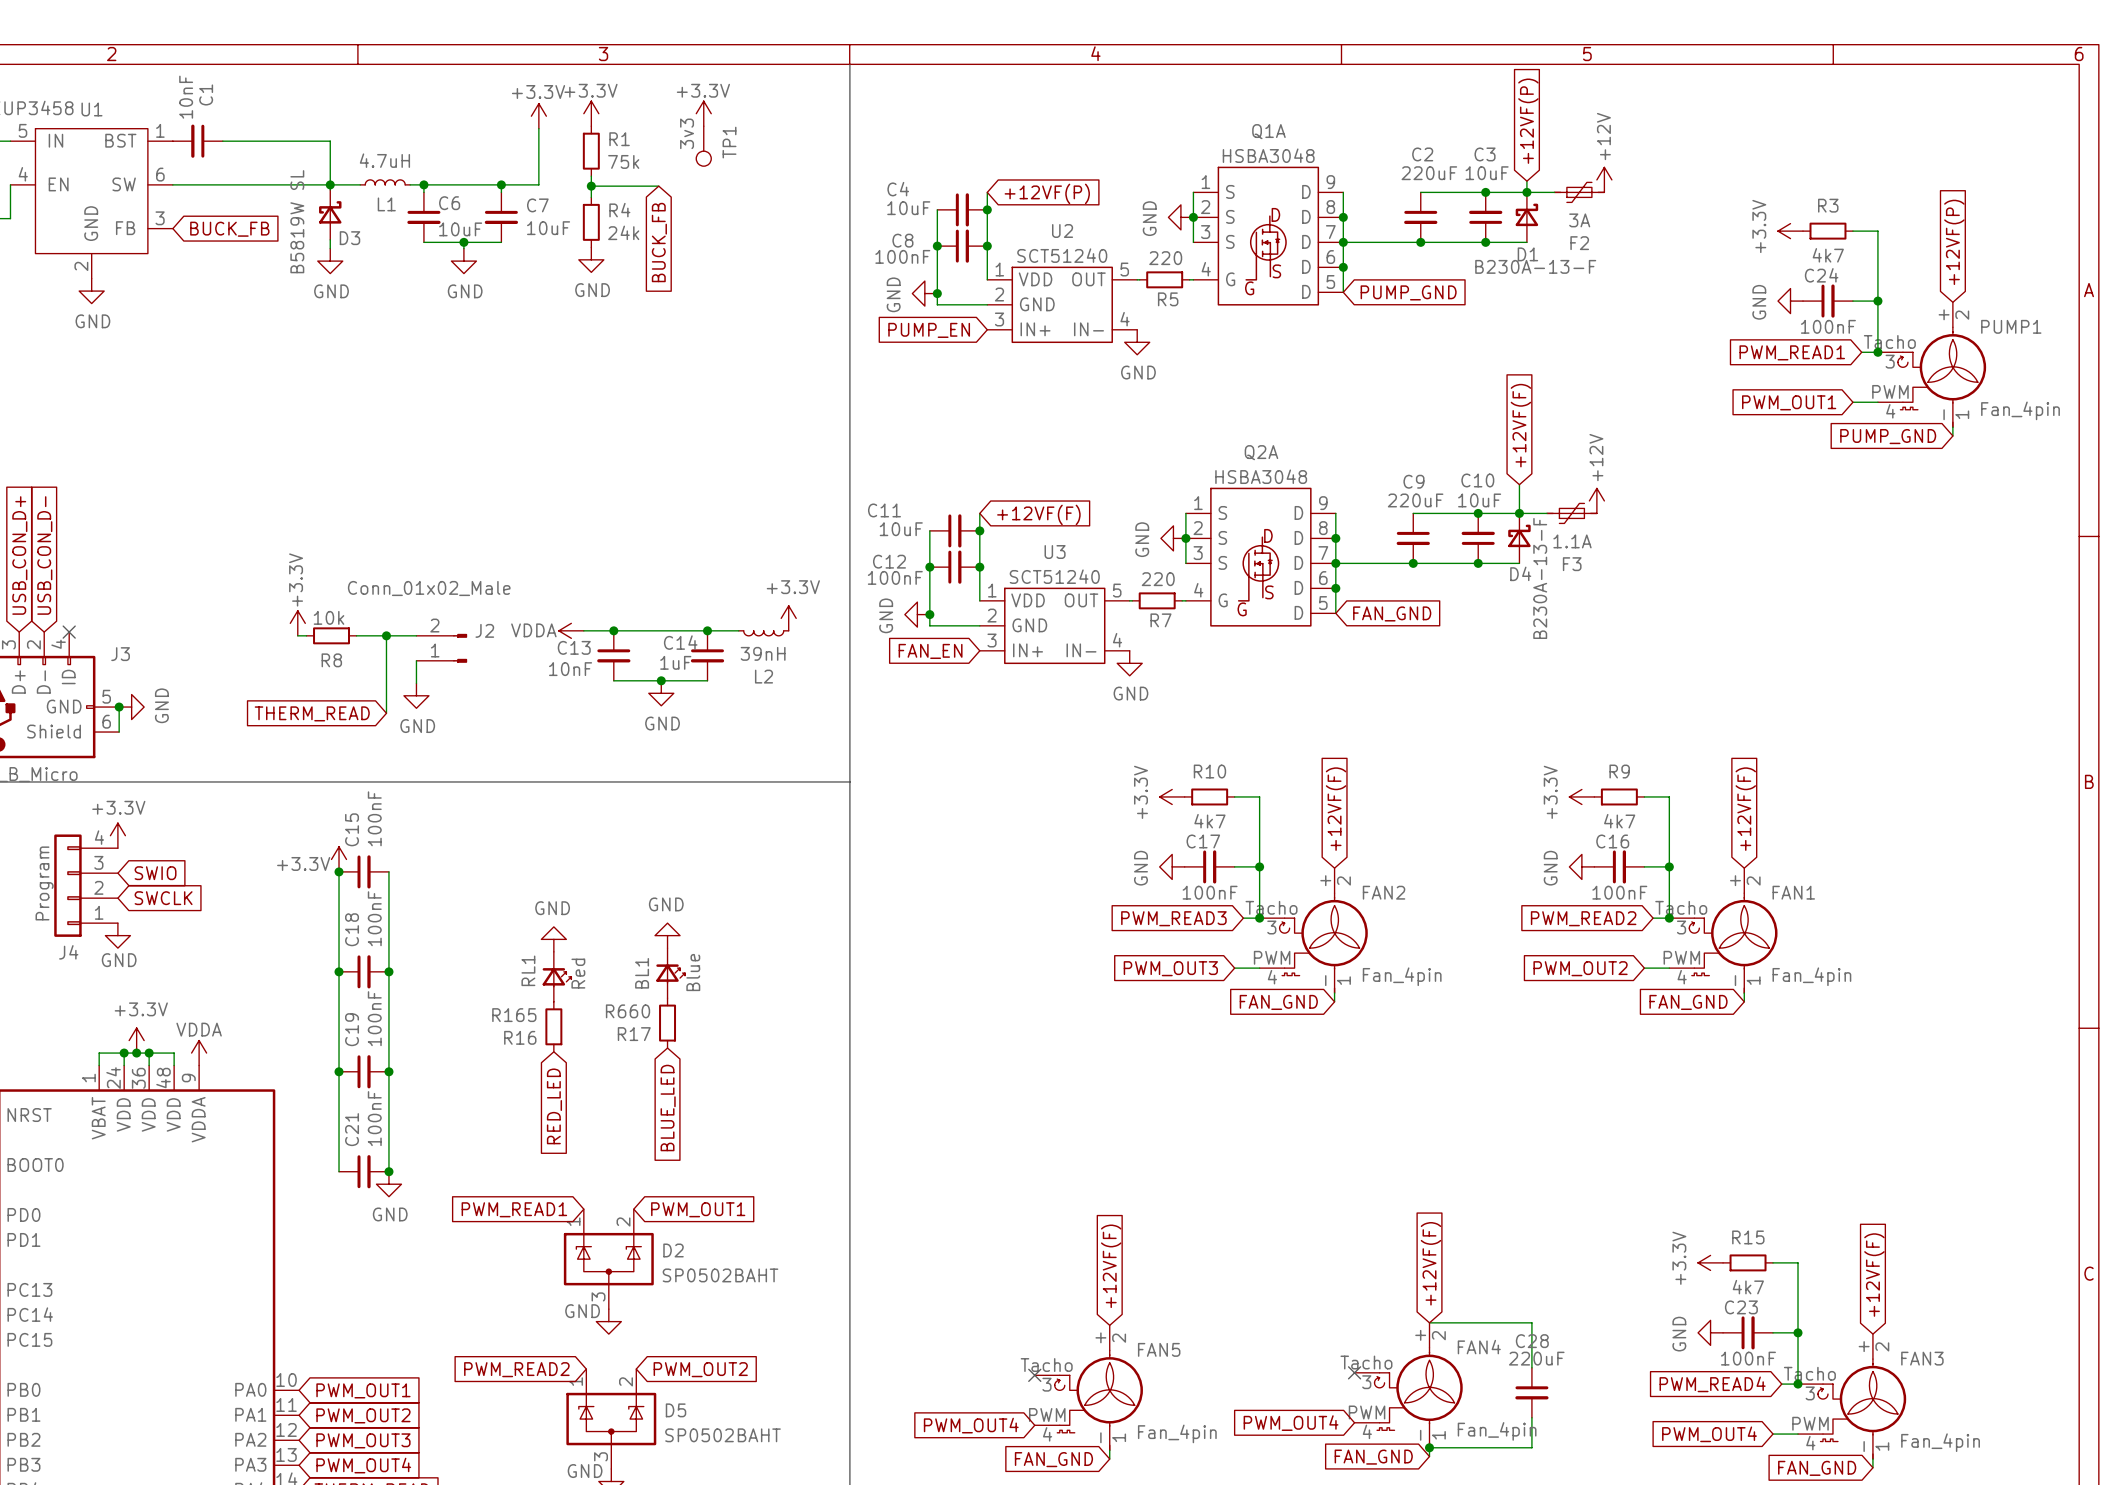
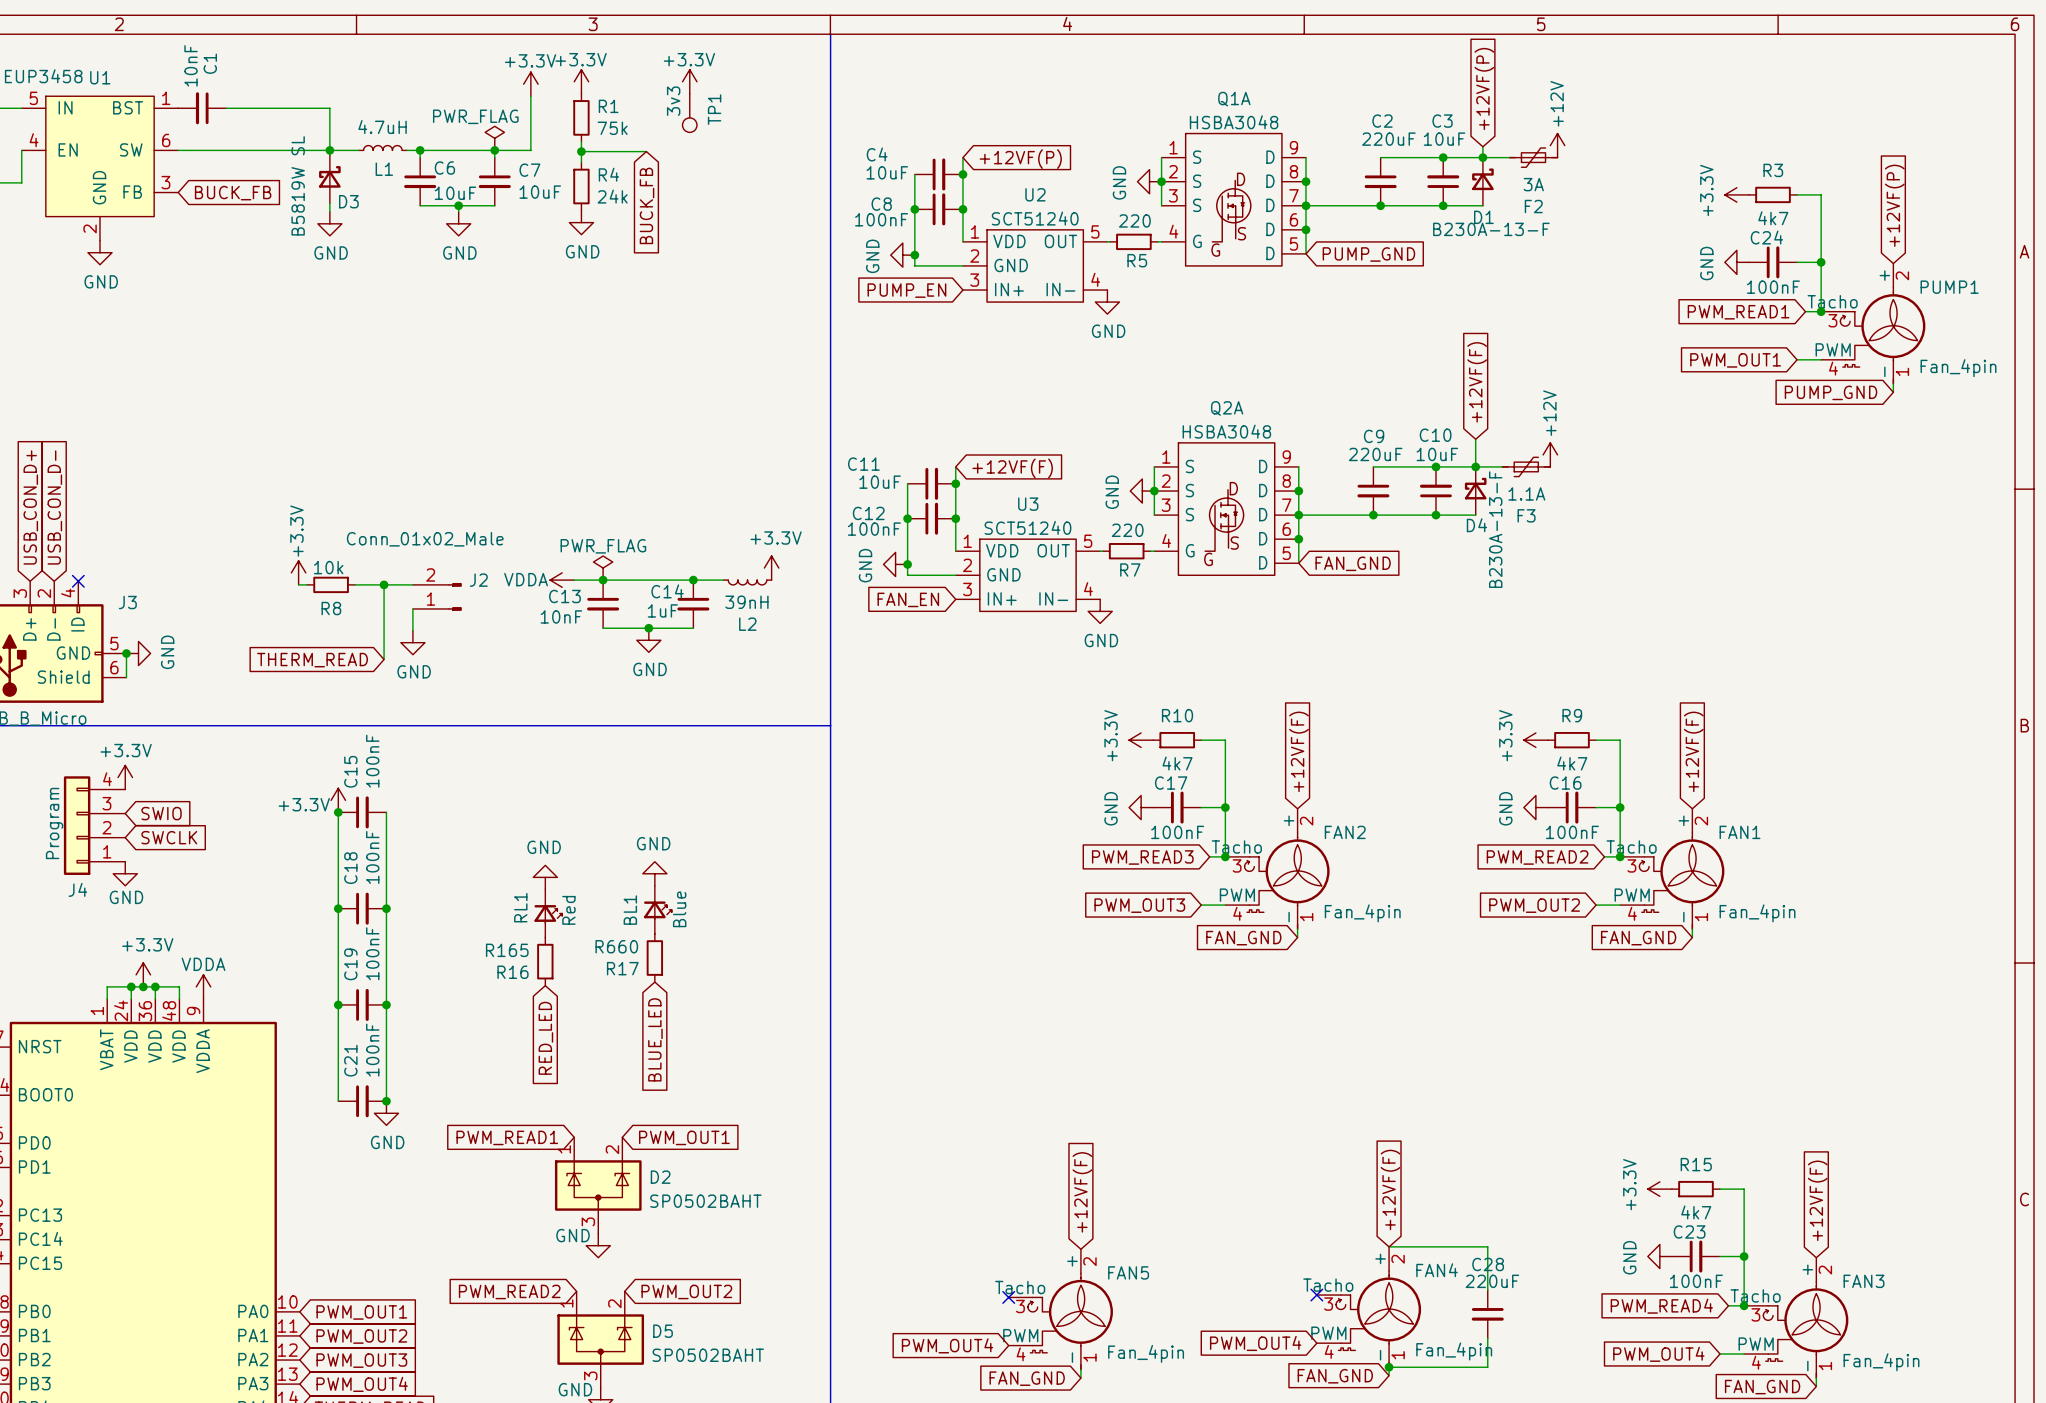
power symbol: none -> PWR_FLAG (494, 138)
power symbol: none -> PWR_FLAG (603, 568)

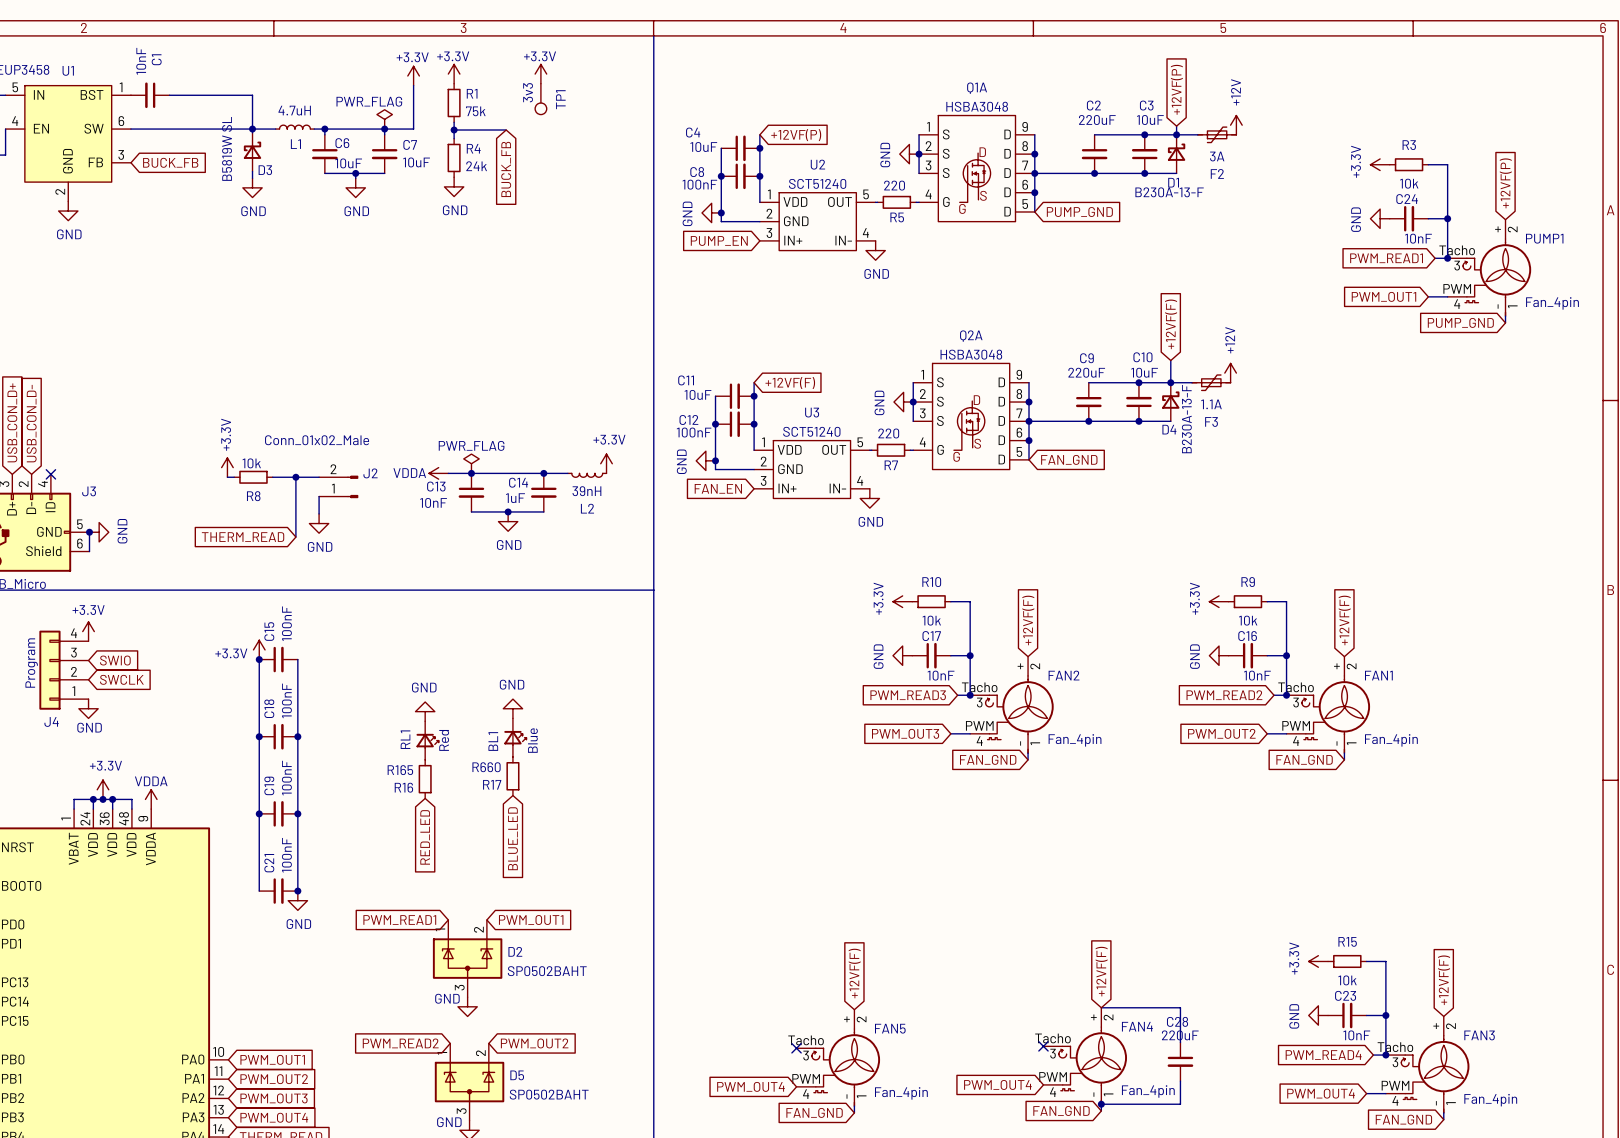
R3 value: 4k7 (1773, 218) -> 10k (1409, 183)
C24 value: 100nF (1773, 287) -> 10nF (1418, 238)
R10 value: 4k7 (1177, 763) -> 10k (931, 620)
R9 value: 4k7 (1572, 763) -> 10k (1248, 620)
C17 value: 100nF (1177, 832) -> 10nF (941, 675)
C16 value: 100nF (1572, 832) -> 10nF (1257, 675)
R15 value: 4k7 (1696, 1212) -> 10k (1347, 980)
C23 value: 100nF (1696, 1281) -> 10nF (1356, 1035)

